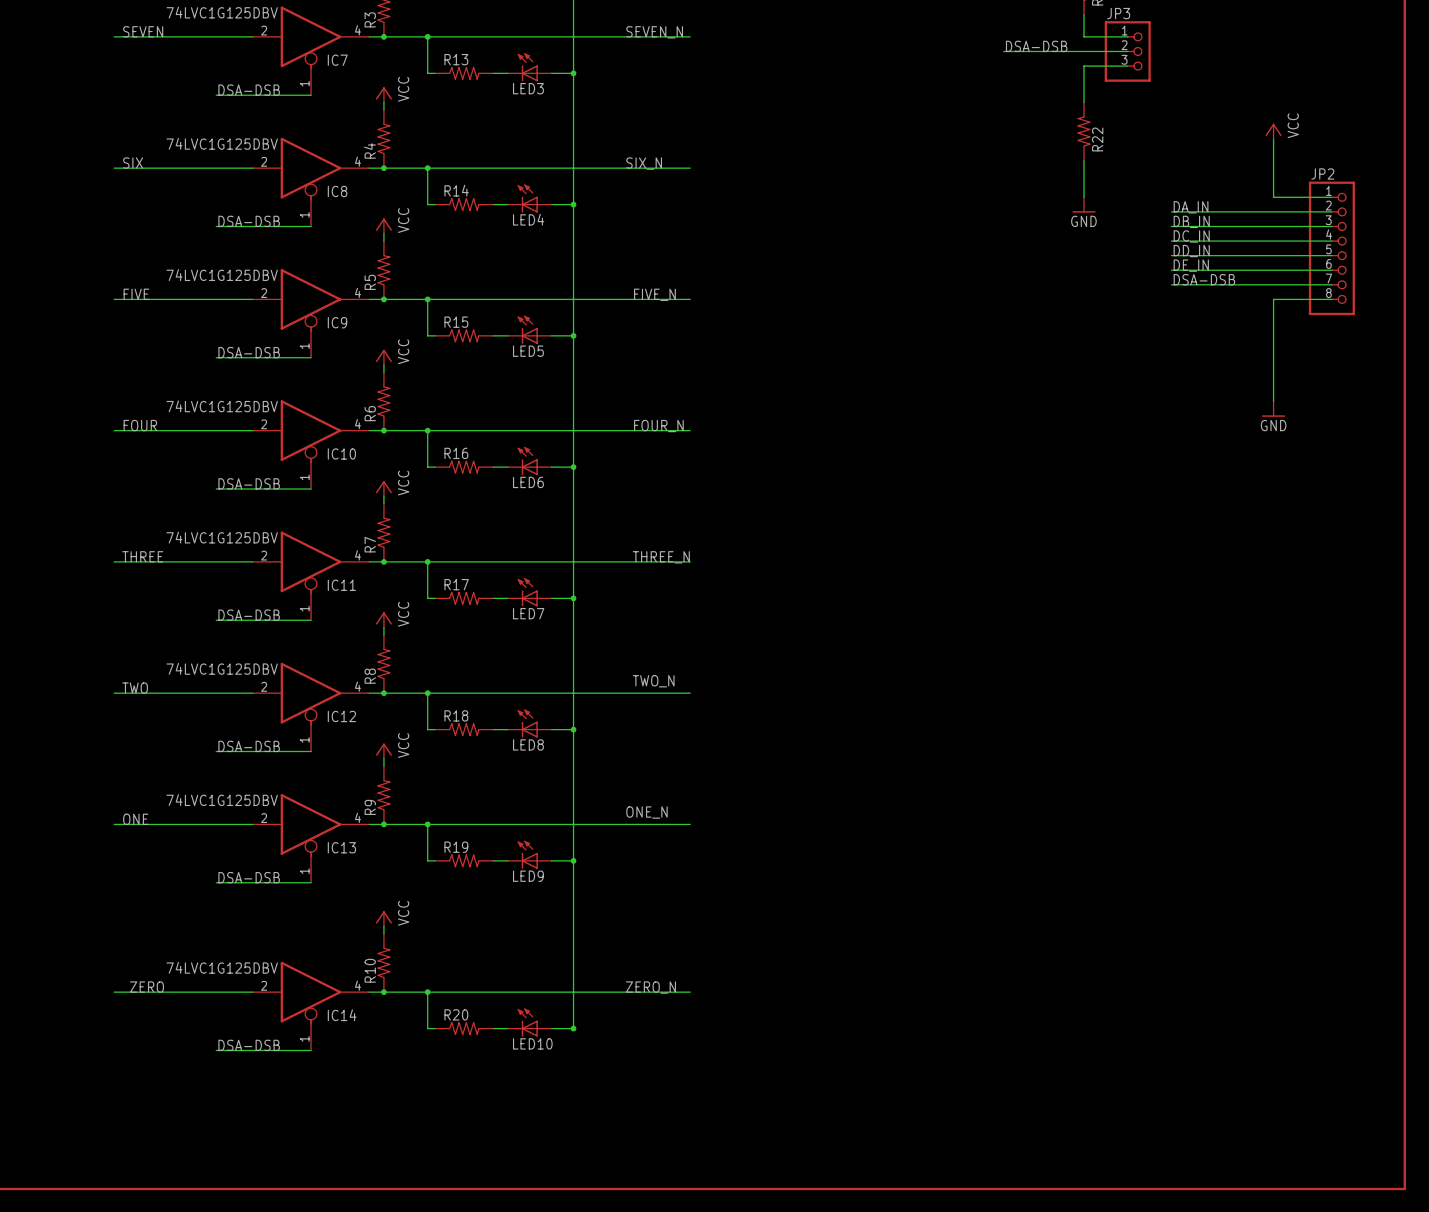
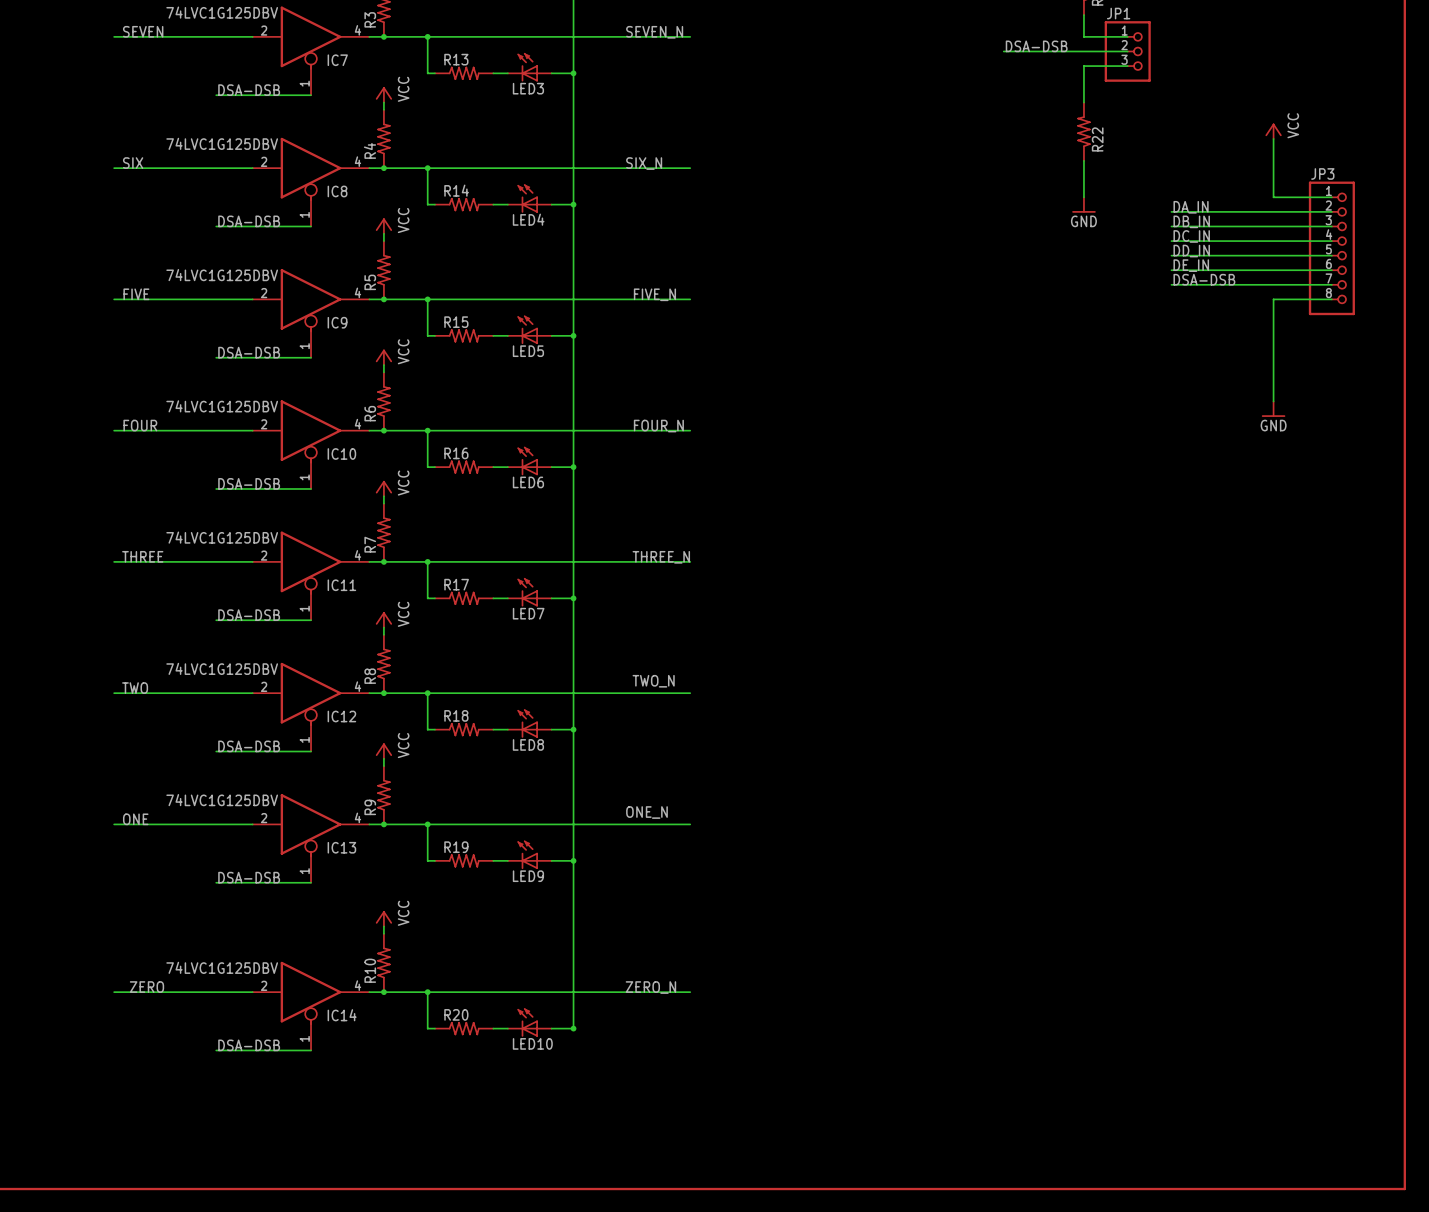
JP3 name: JP3 (1118, 13) -> JP1 (1118, 13)
JP2 name: JP2 (1322, 173) -> JP3 (1322, 173)

